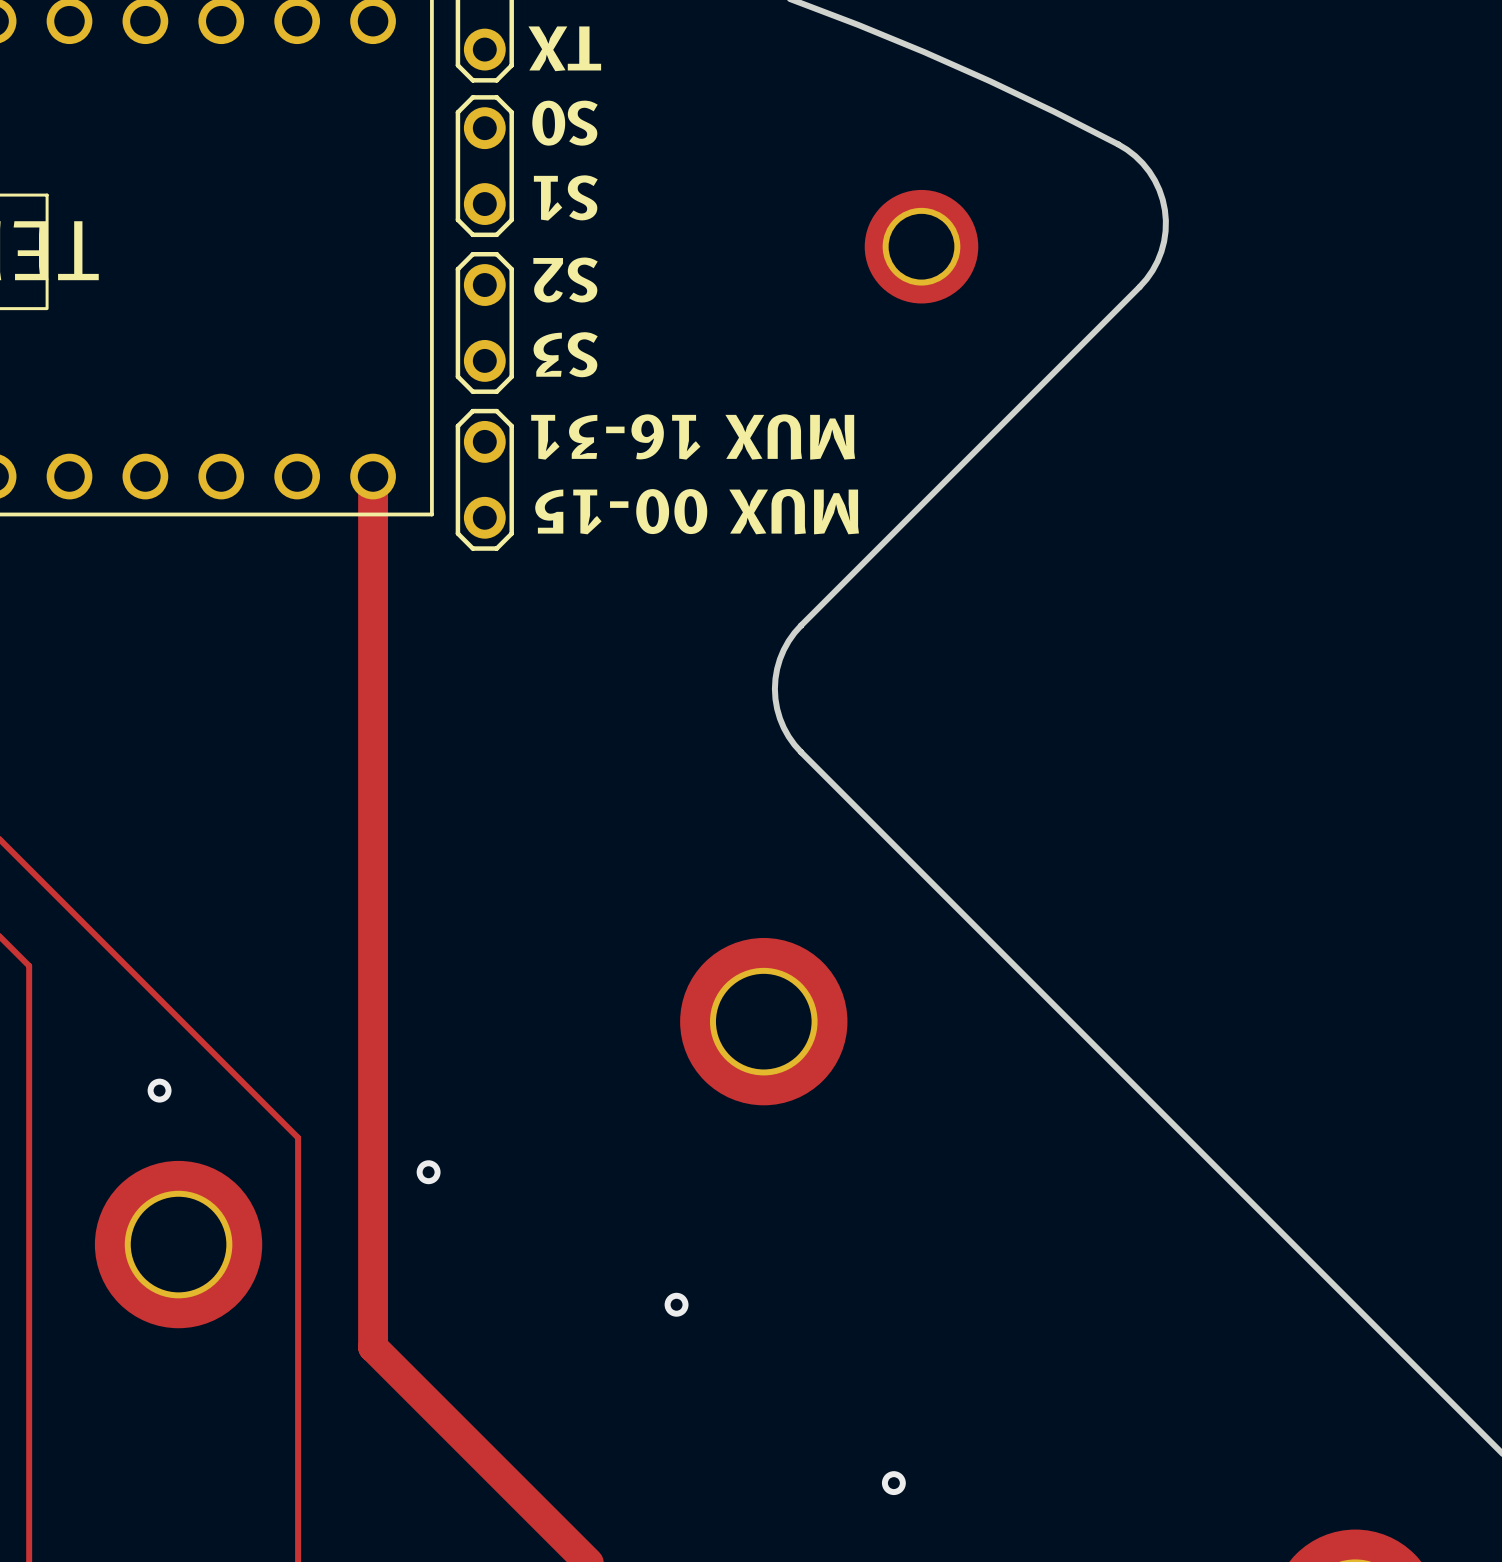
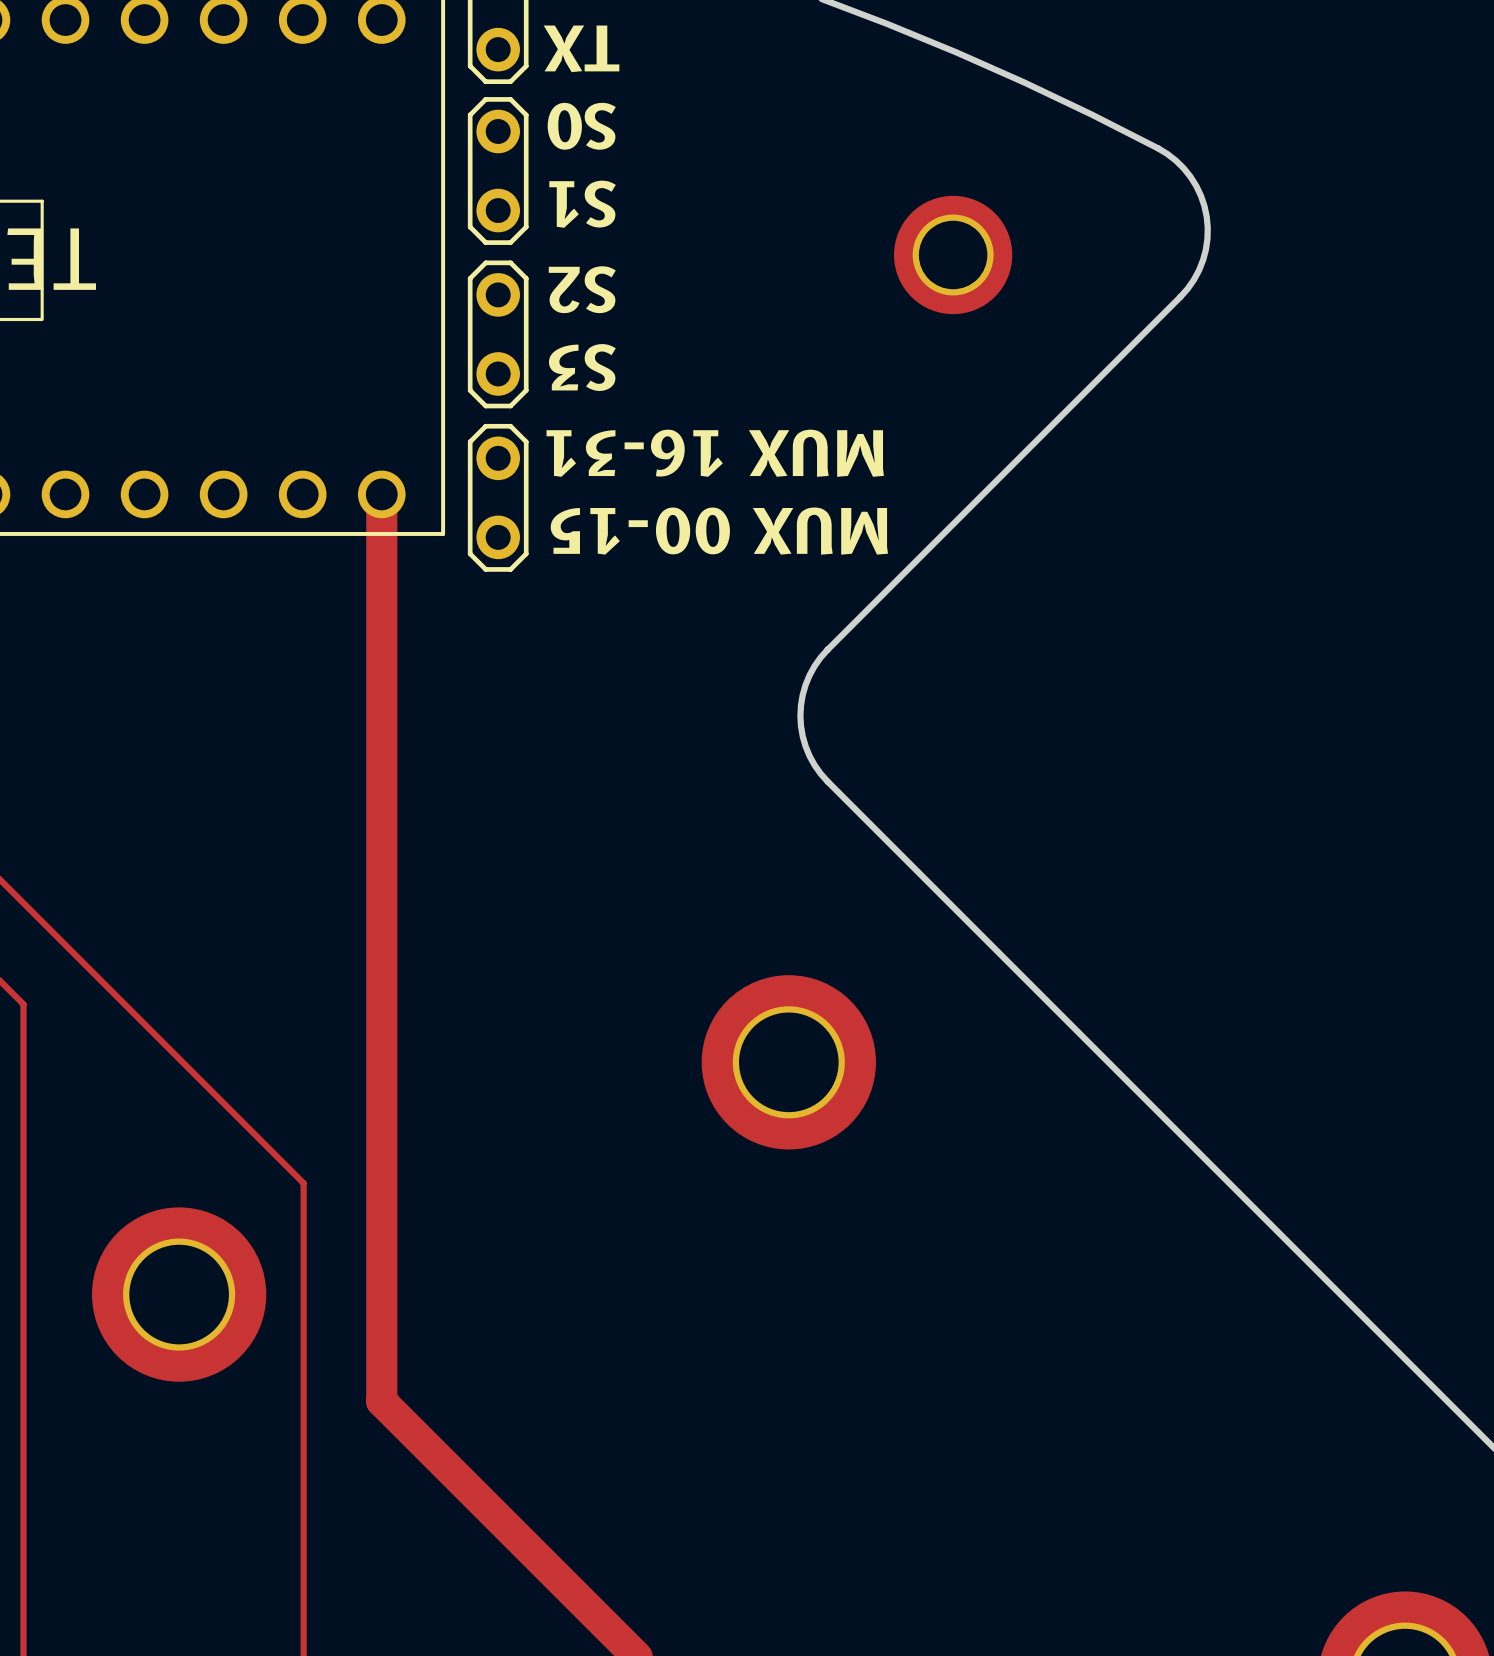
via: (159, 1090) -> none
via: (428, 1172) -> none
via: (676, 1304) -> none
via: (893, 1483) -> none

